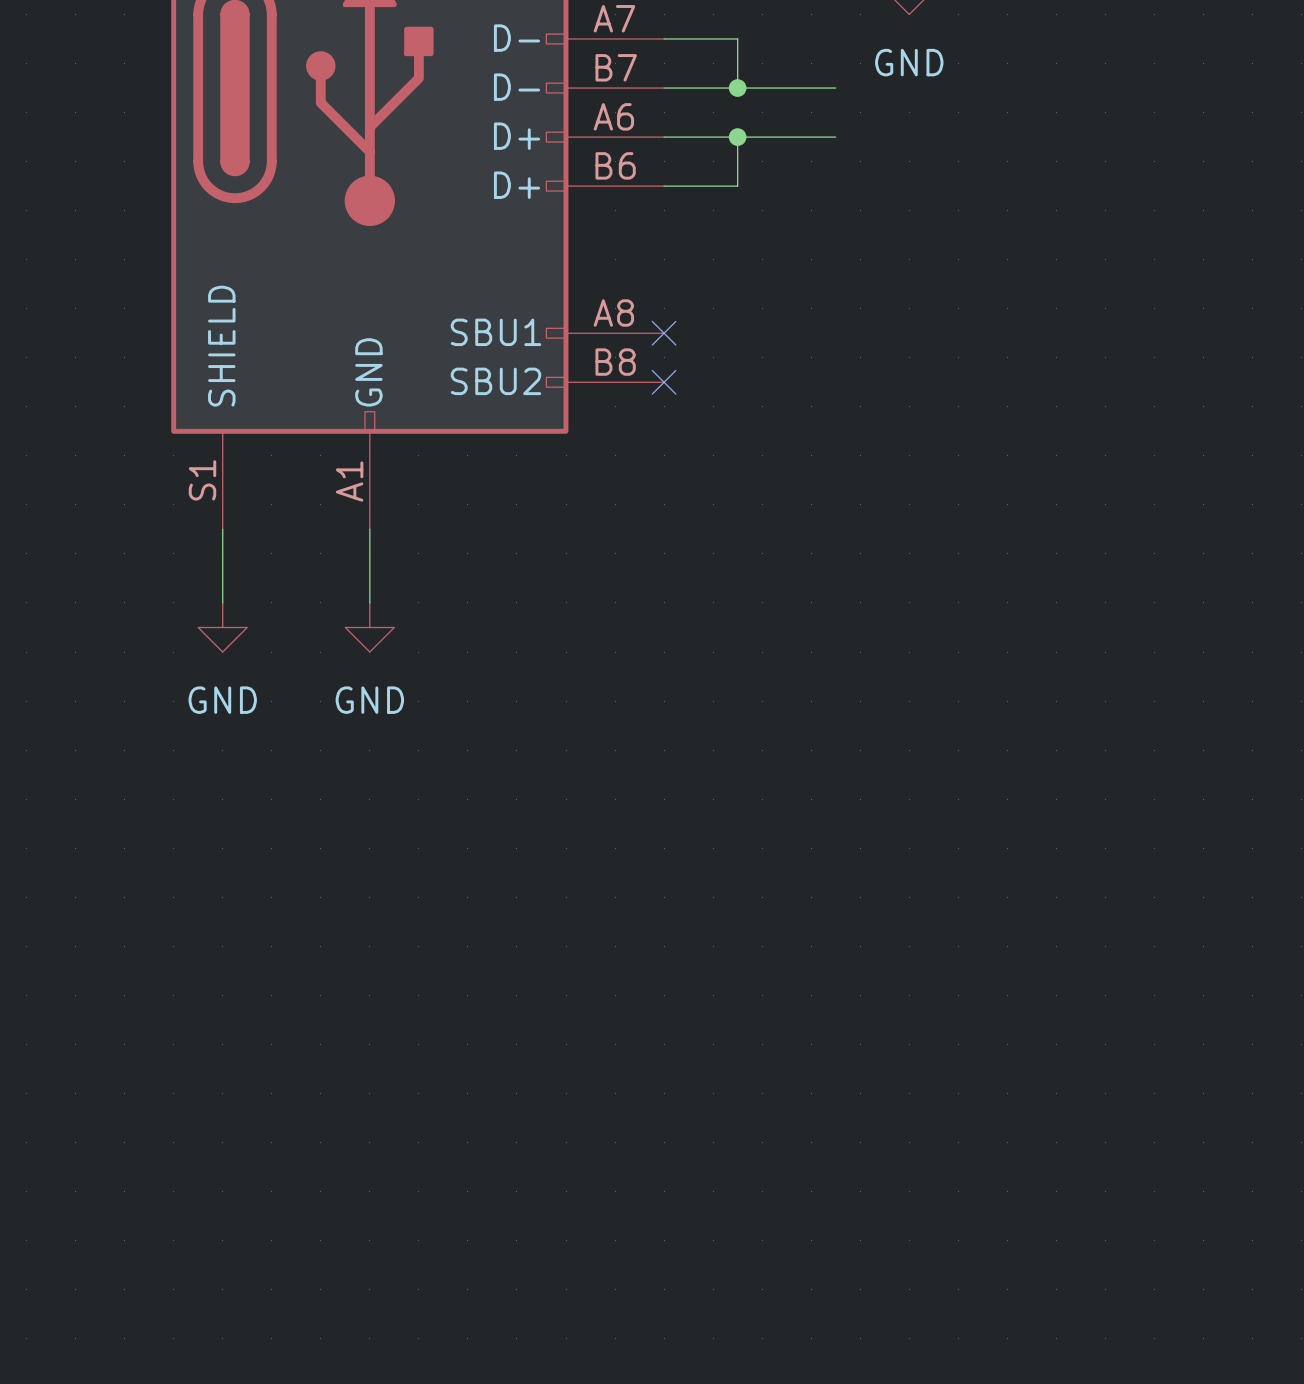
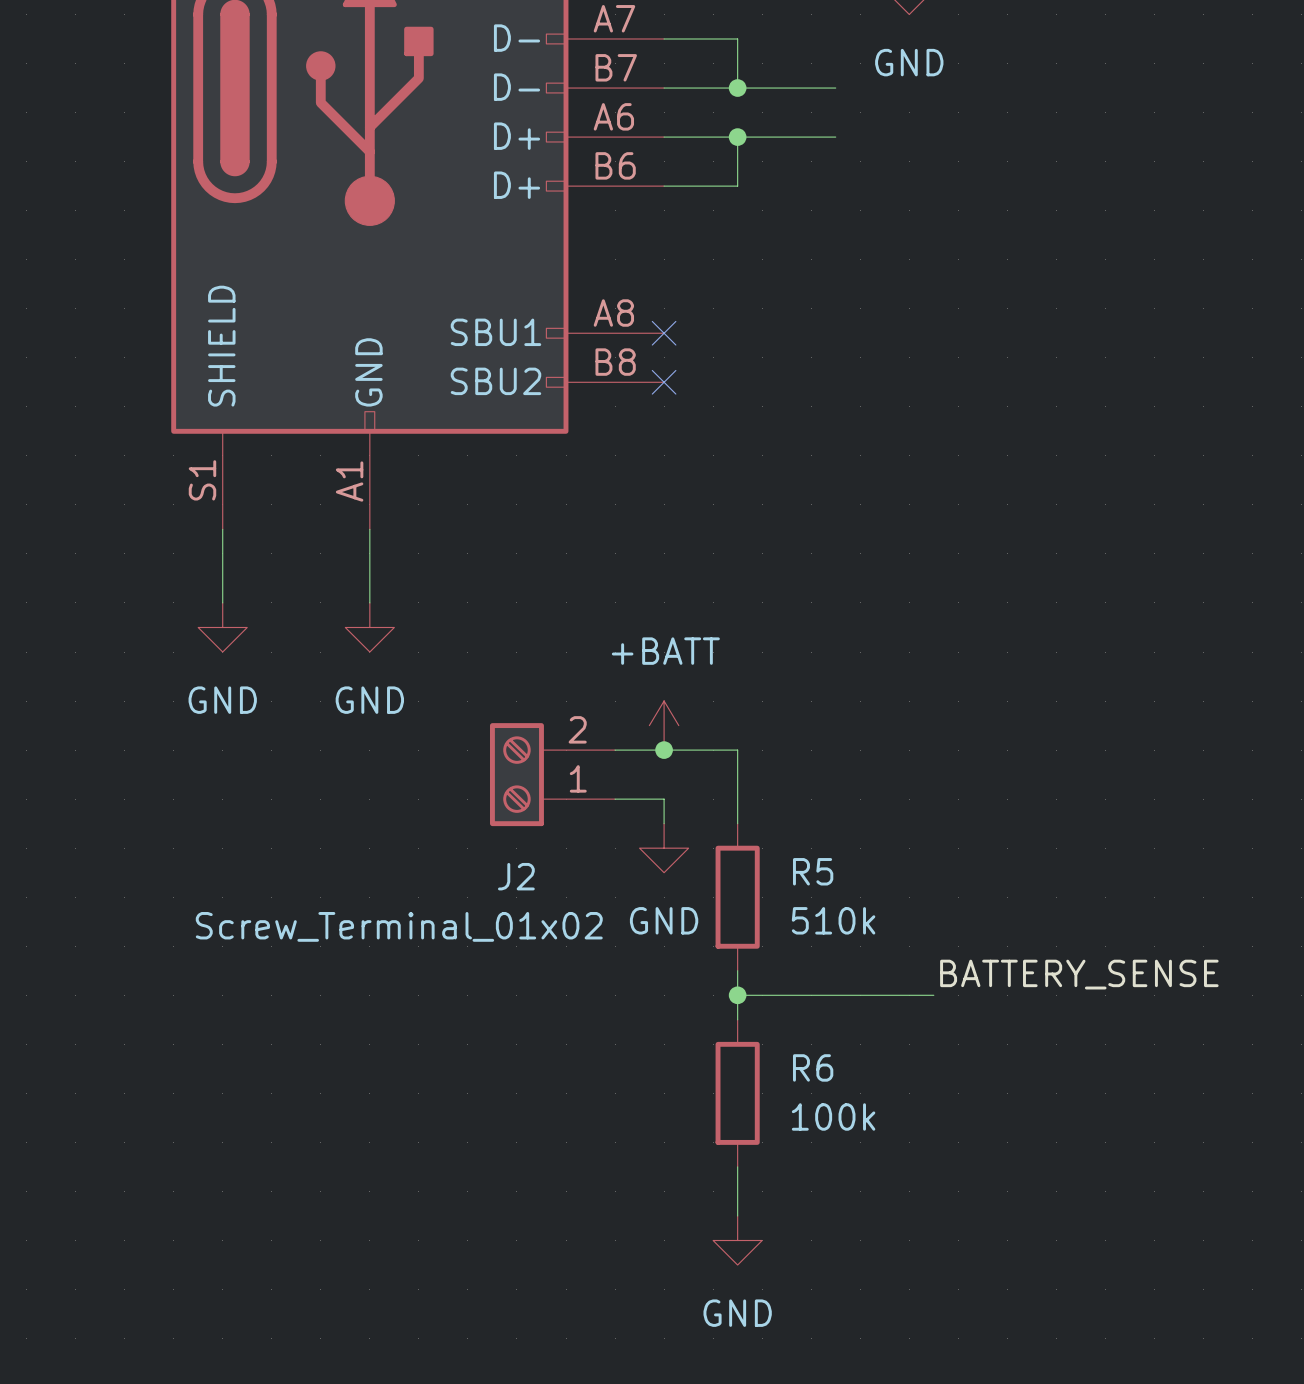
power symbol: none -> +BATT (664, 725)
wire: none -> (615, 750) (737, 750) (737, 823)
junction: none -> (664, 750)
J2: none -> Screw_Terminal_01x02 (552, 774)
wire: none -> (615, 799) (664, 799) (664, 823)
power symbol: none -> GND (664, 848)
R5: none -> 510k (737, 897)
wire: none -> (737, 970) (737, 1019)
label: none -> BATTERY_SENSE (1079, 974)
wire: none -> (737, 995) (933, 995)
junction: none -> (737, 995)
R6: none -> 100k (737, 1093)
wire: none -> (737, 1166) (737, 1215)
power symbol: none -> GND (737, 1240)

